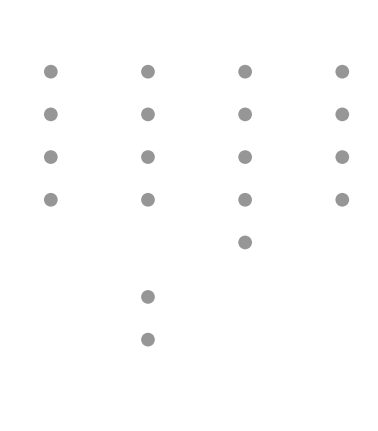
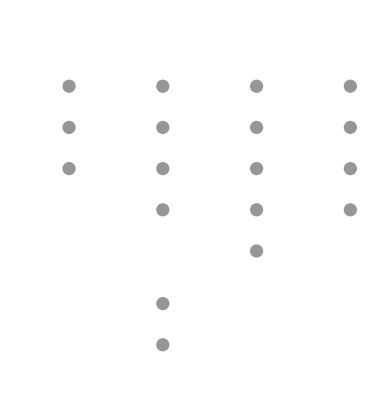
part: (50, 199) -> none

